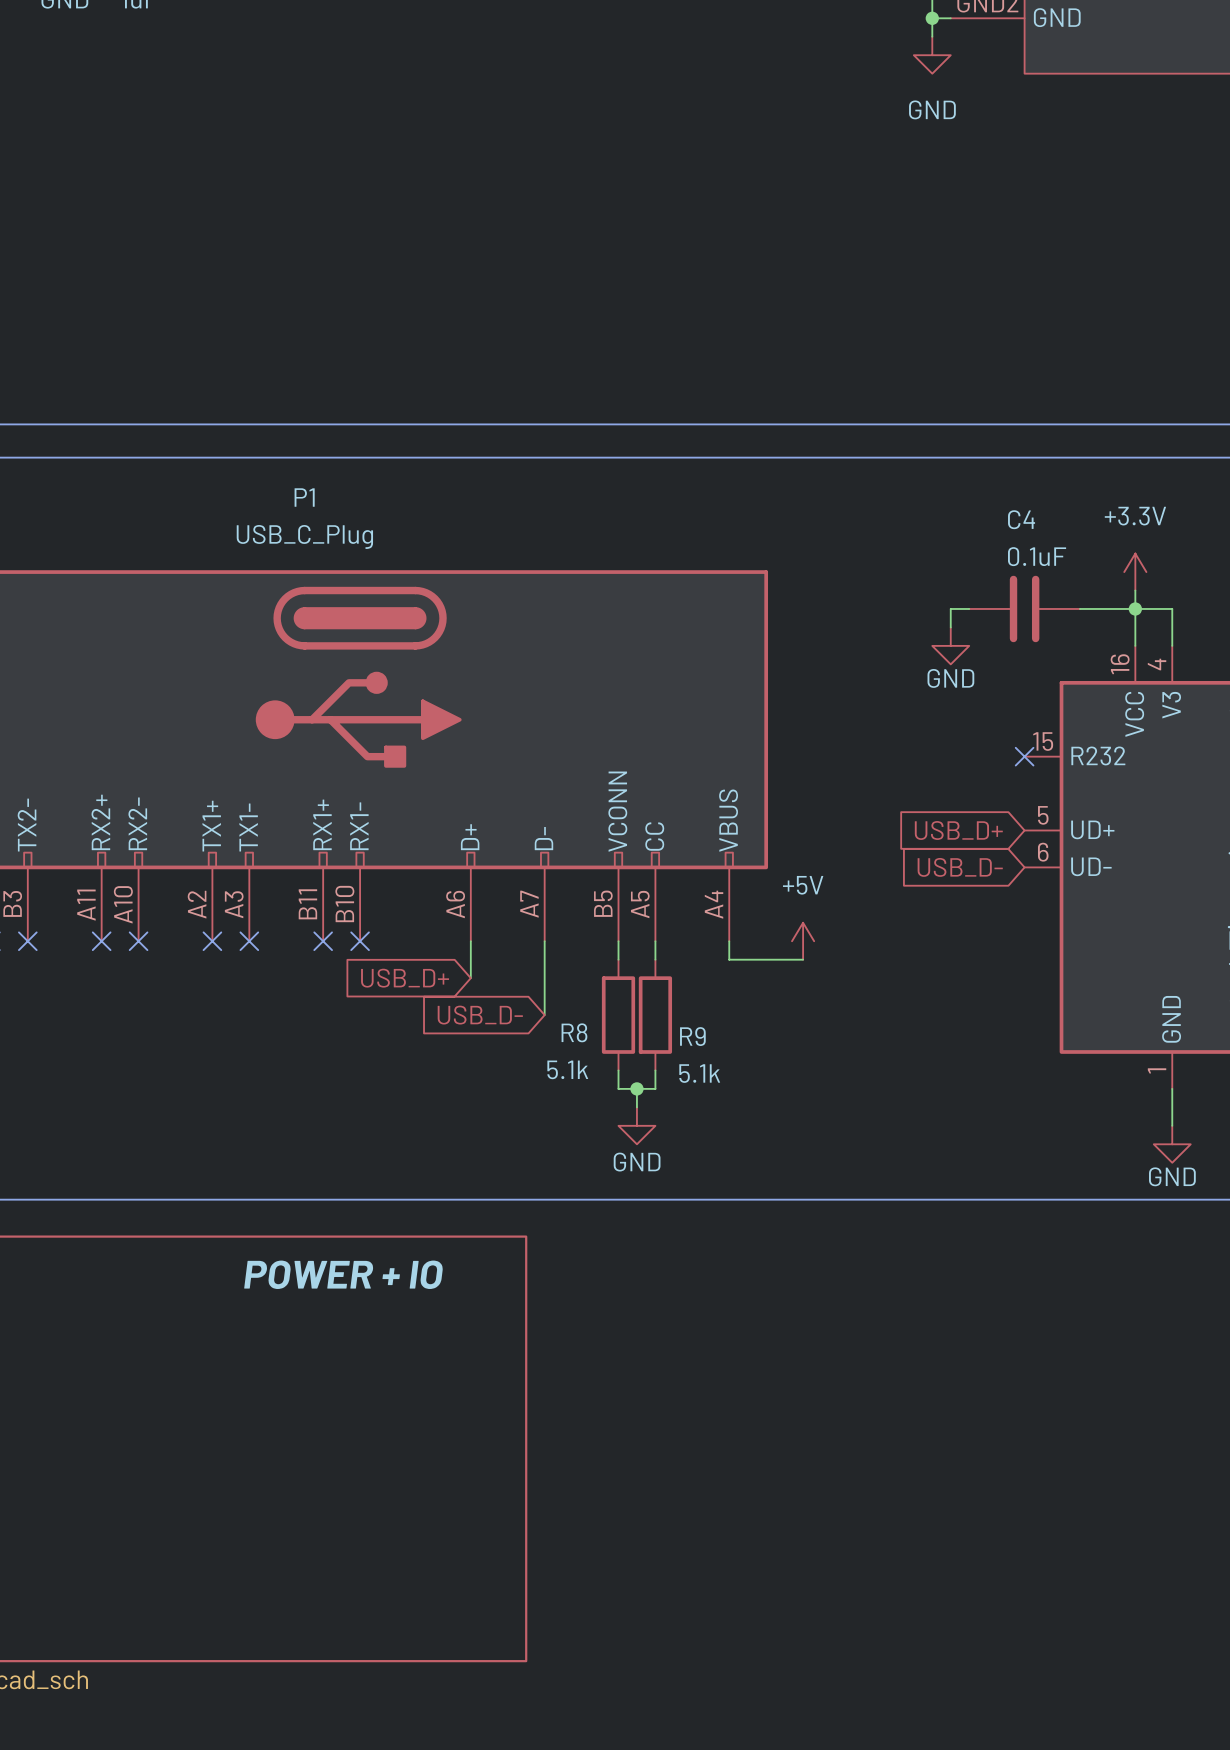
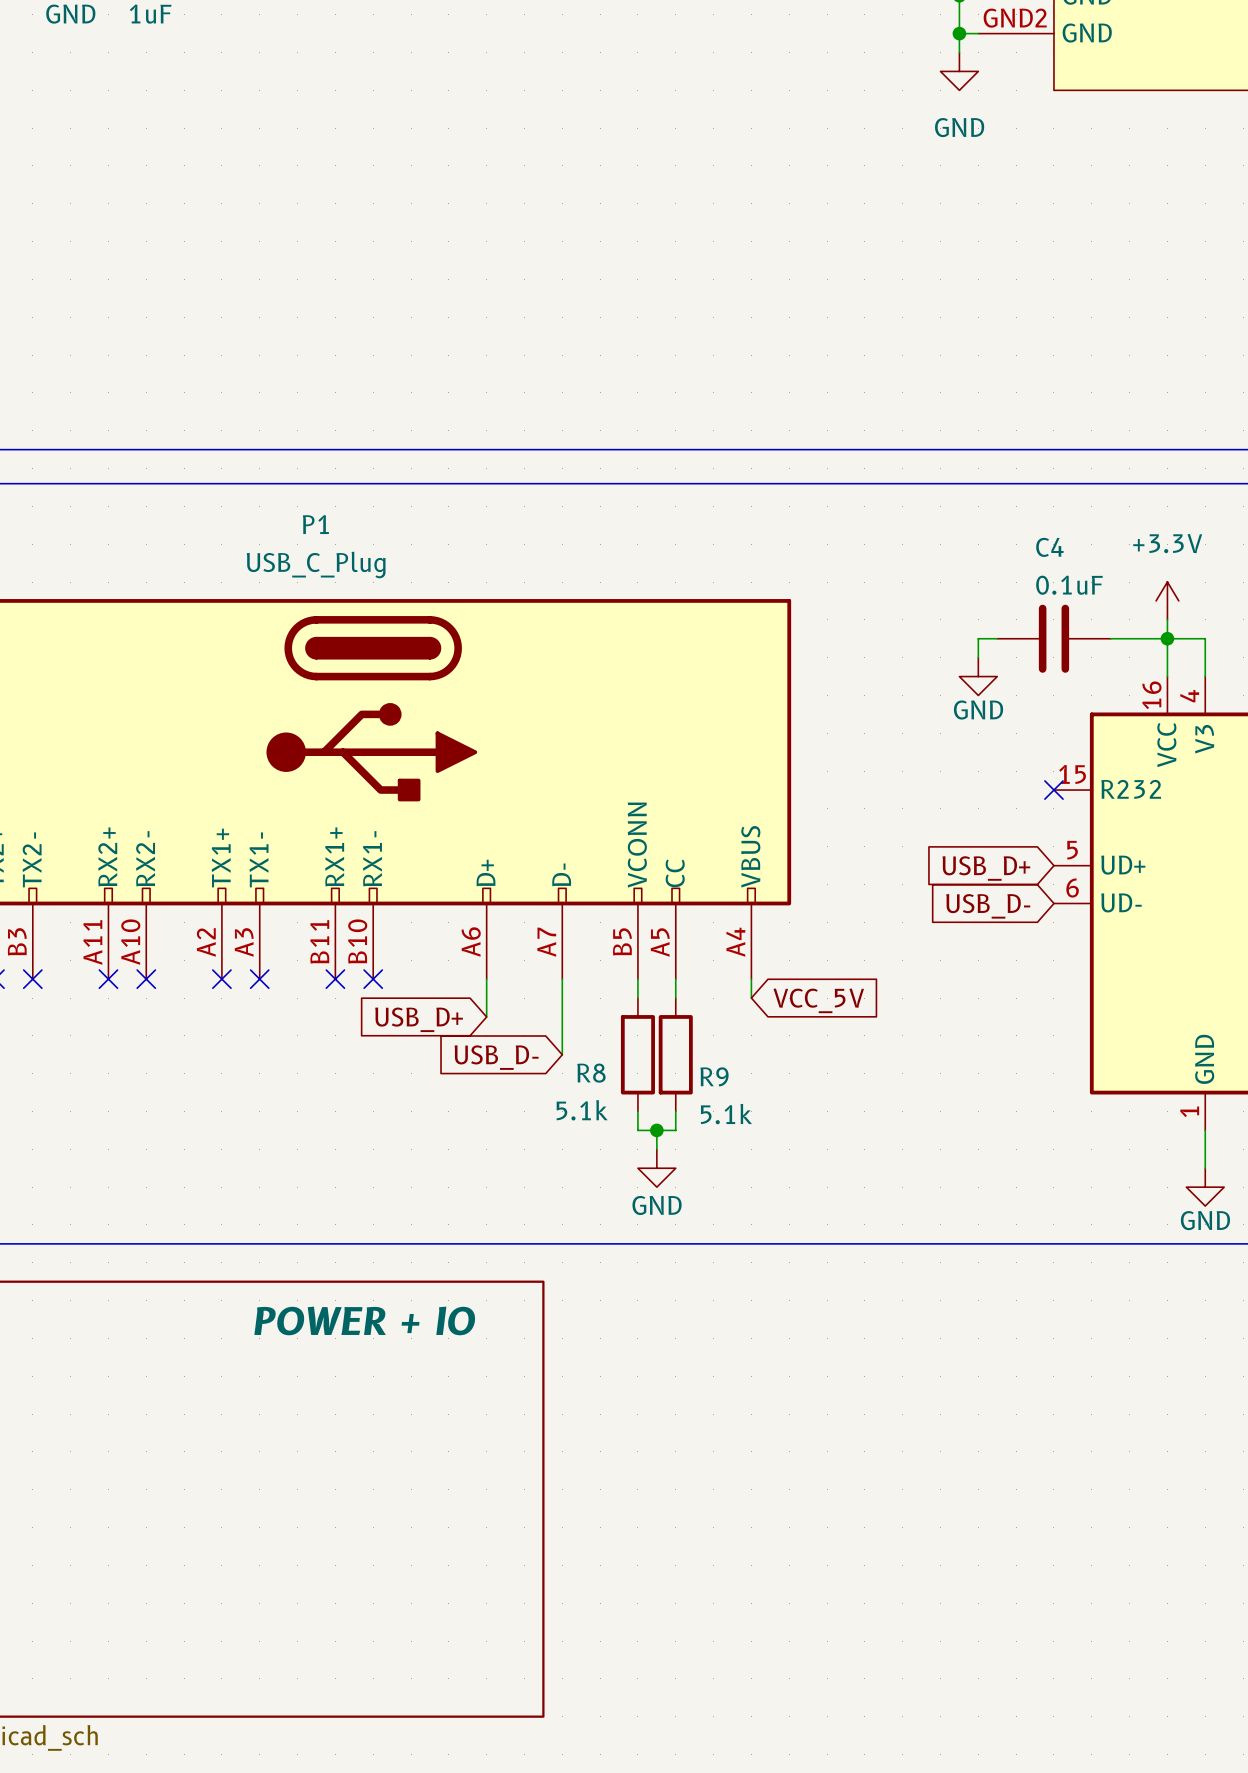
power symbol: +5V (803, 941) -> none
wire: (729, 959) (803, 959) -> none
global label: none -> VCC_5V (818, 1000)

